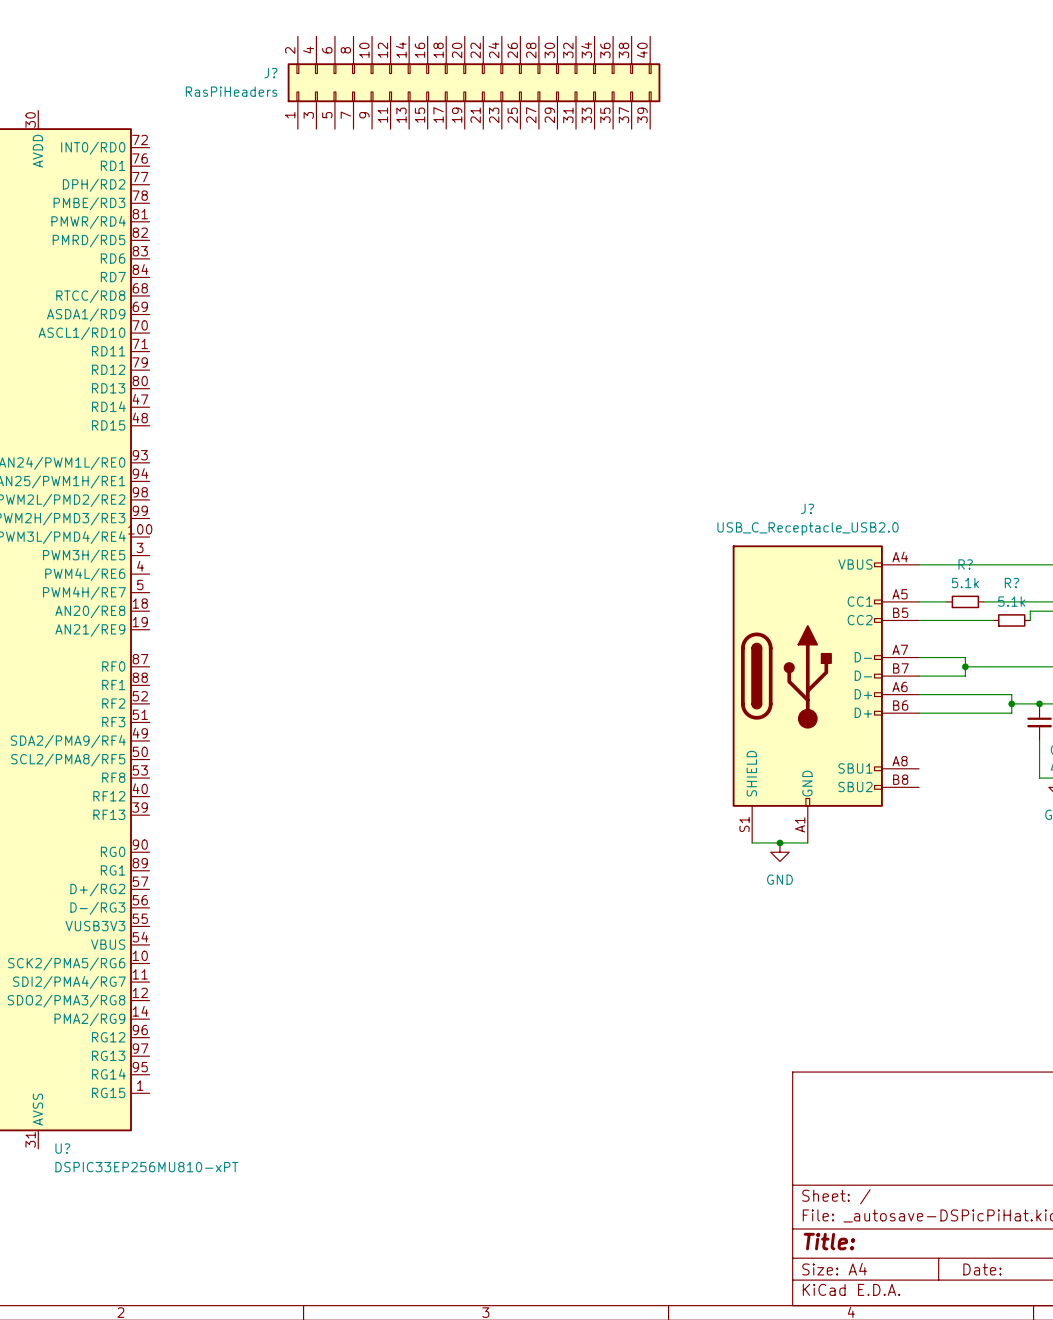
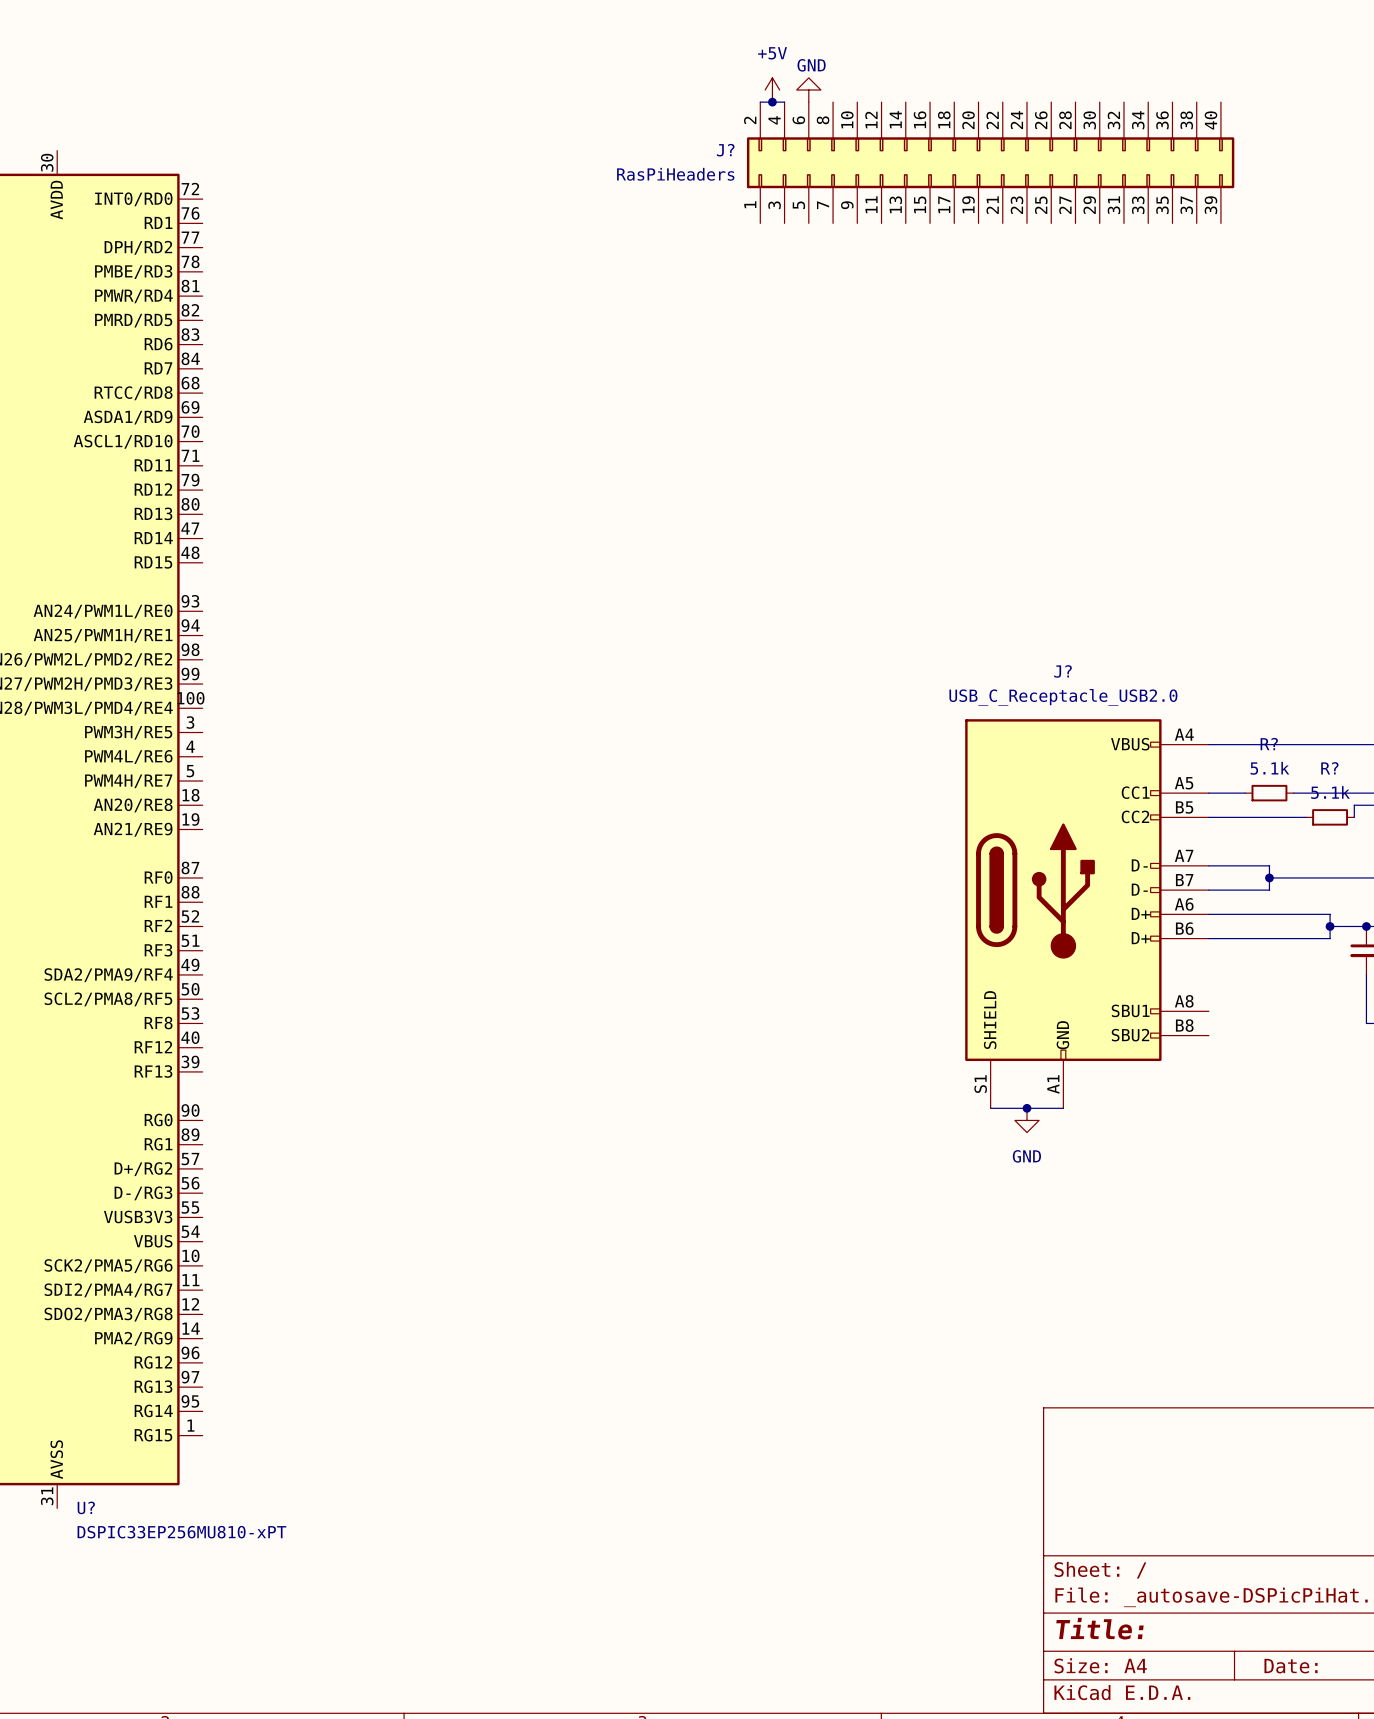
power symbol: none -> +5V (772, 90)
power symbol: none -> GND (808, 90)
junction: none -> (772, 102)
J?: RasPiHeaders (474, 82) -> none
J?: none -> RasPiHeaders (990, 162)

